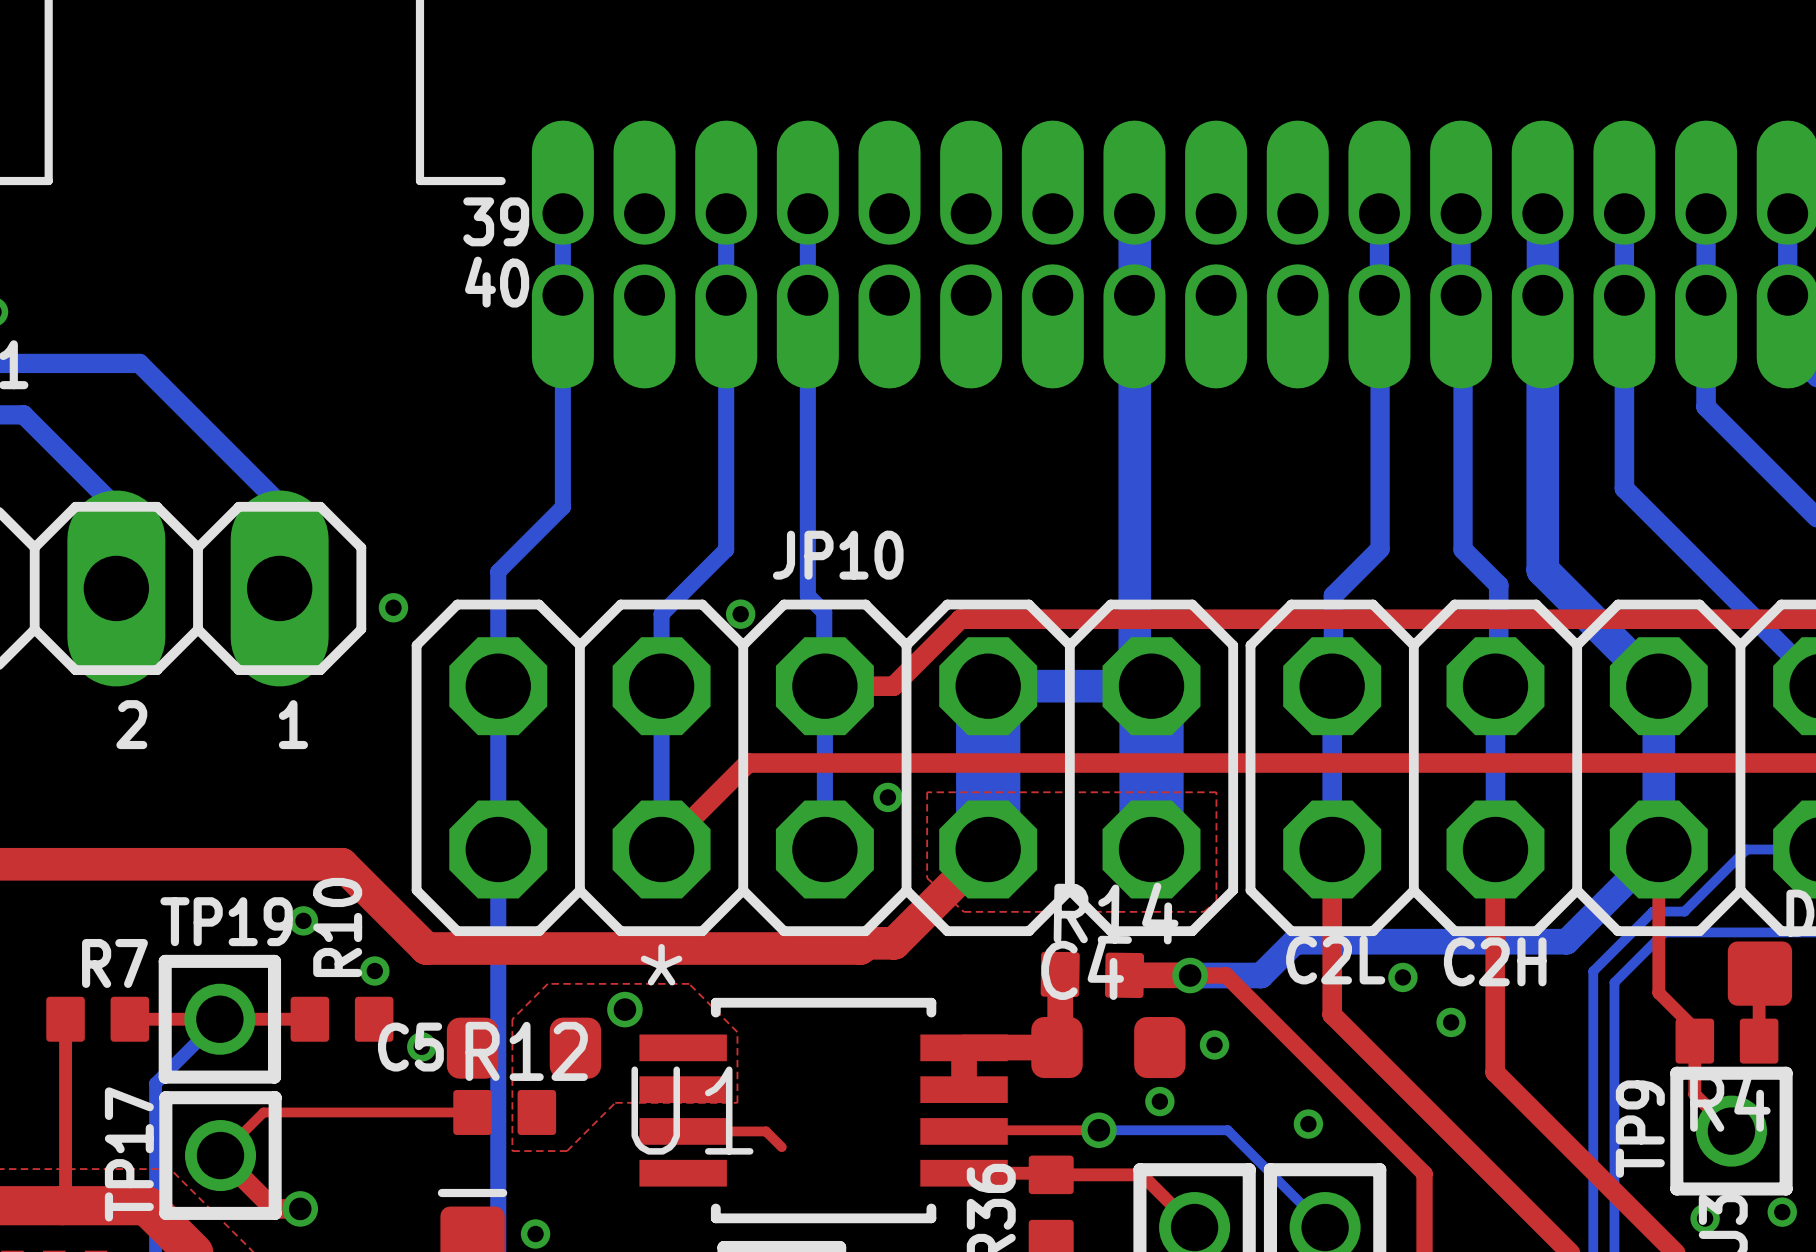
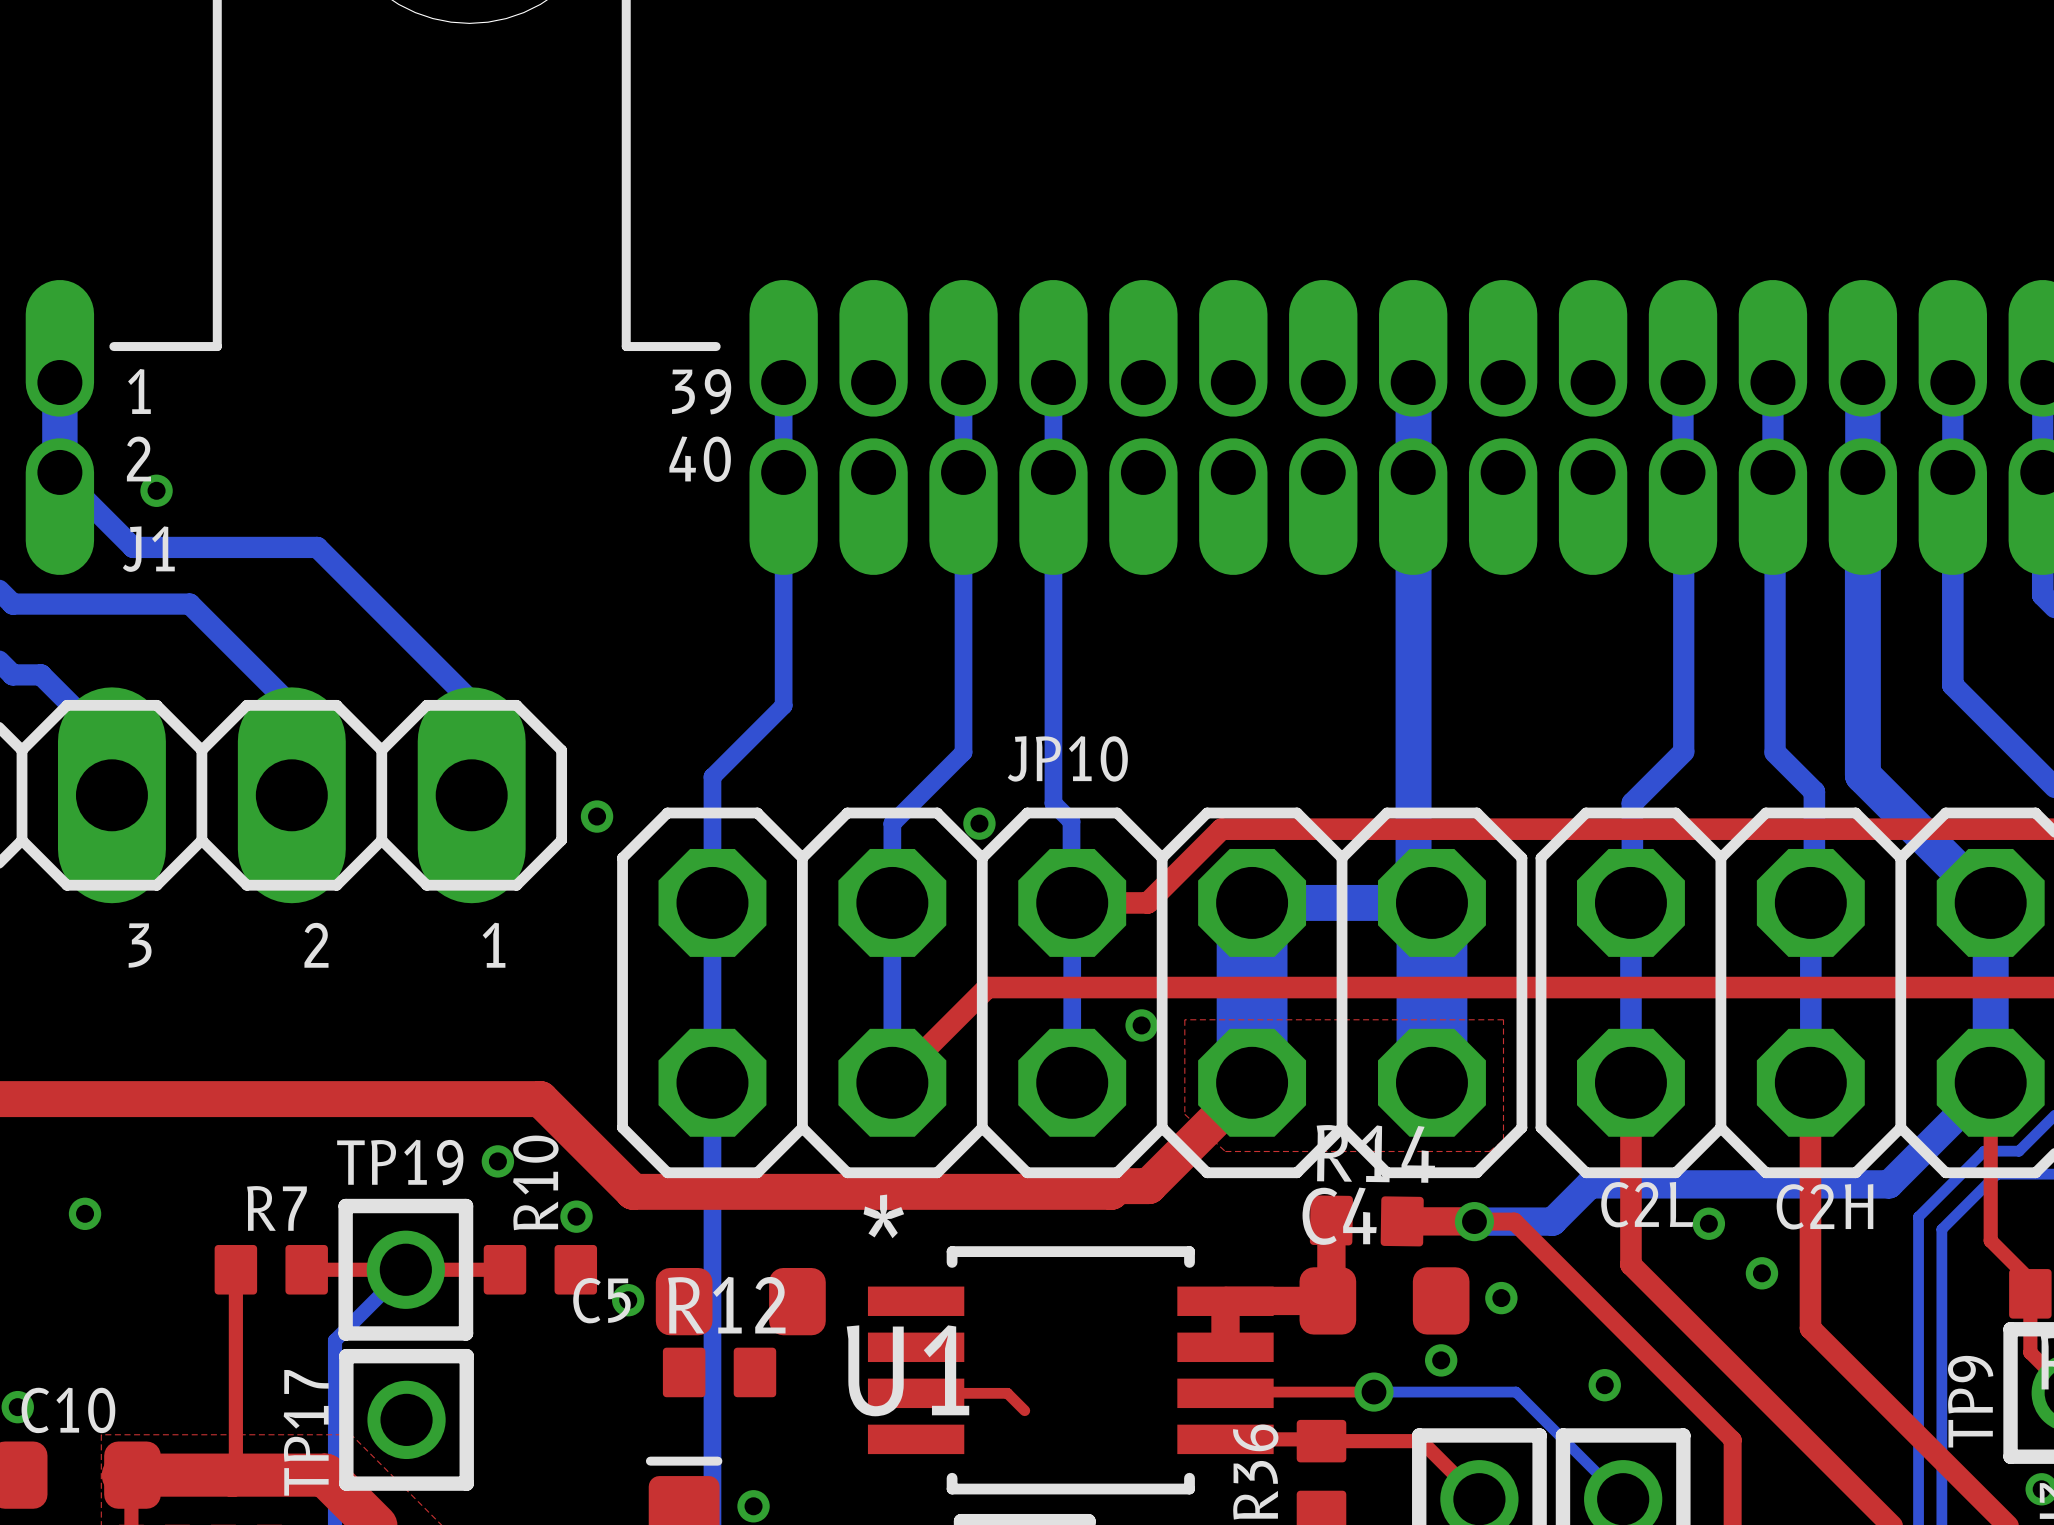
top zone outline: (547, 983) (689, 983) (737, 1032) (737, 1102) (615, 1102) (567, 1151) (512, 1151) (512, 1019) (547, 983) -> none
via: (624, 1009) -> none
top track: (472, 1112) (263, 1112) (220, 1155) (273, 1208) (300, 1208) -> none
via: (300, 1208) -> none

